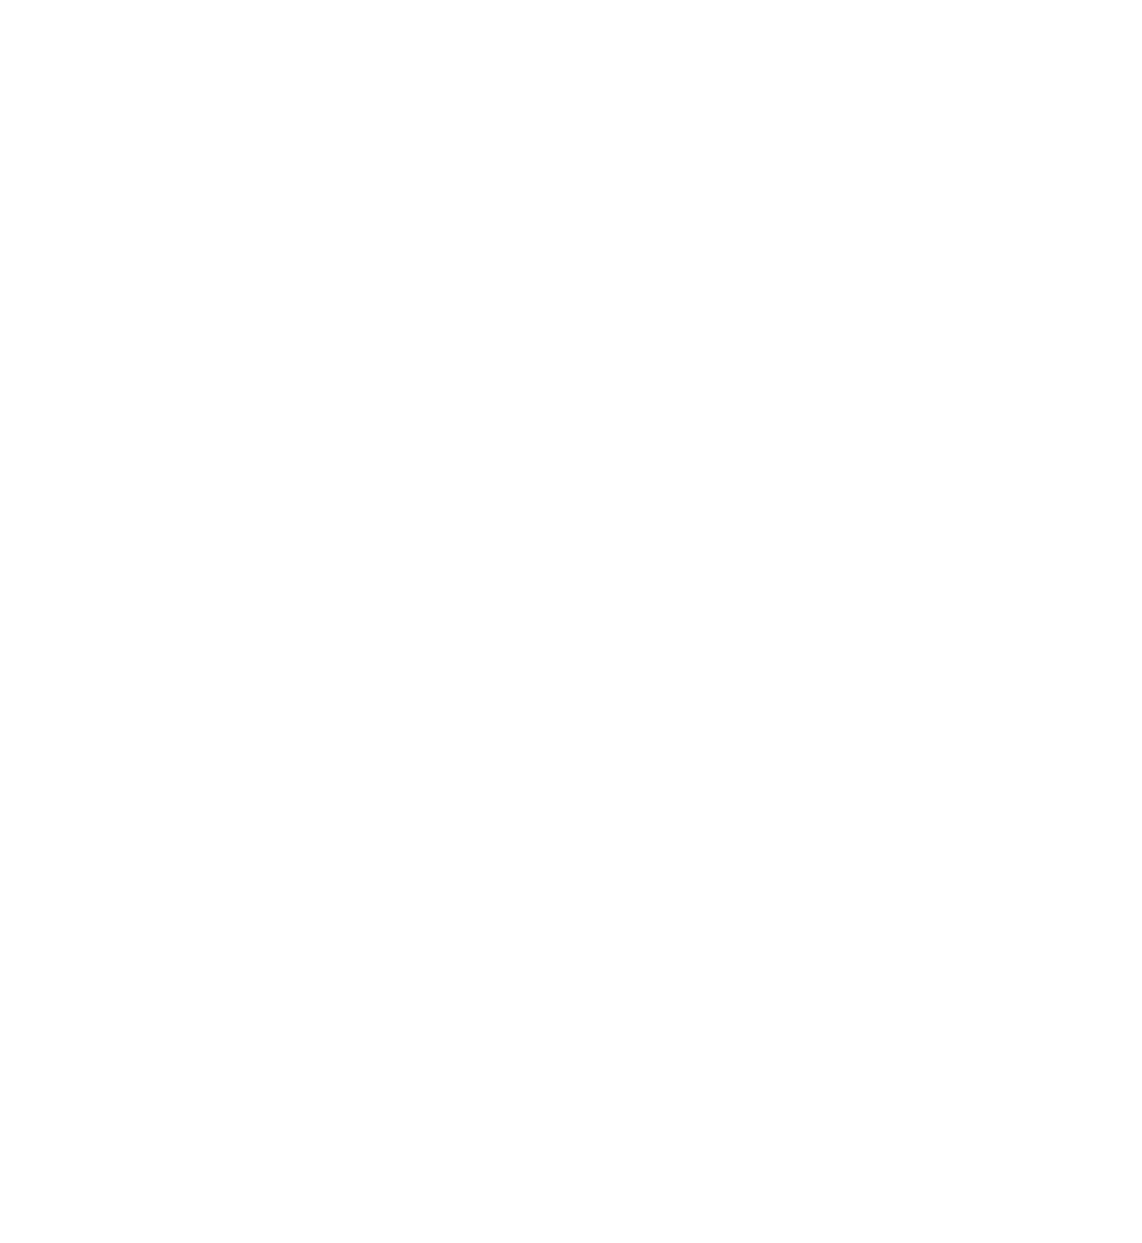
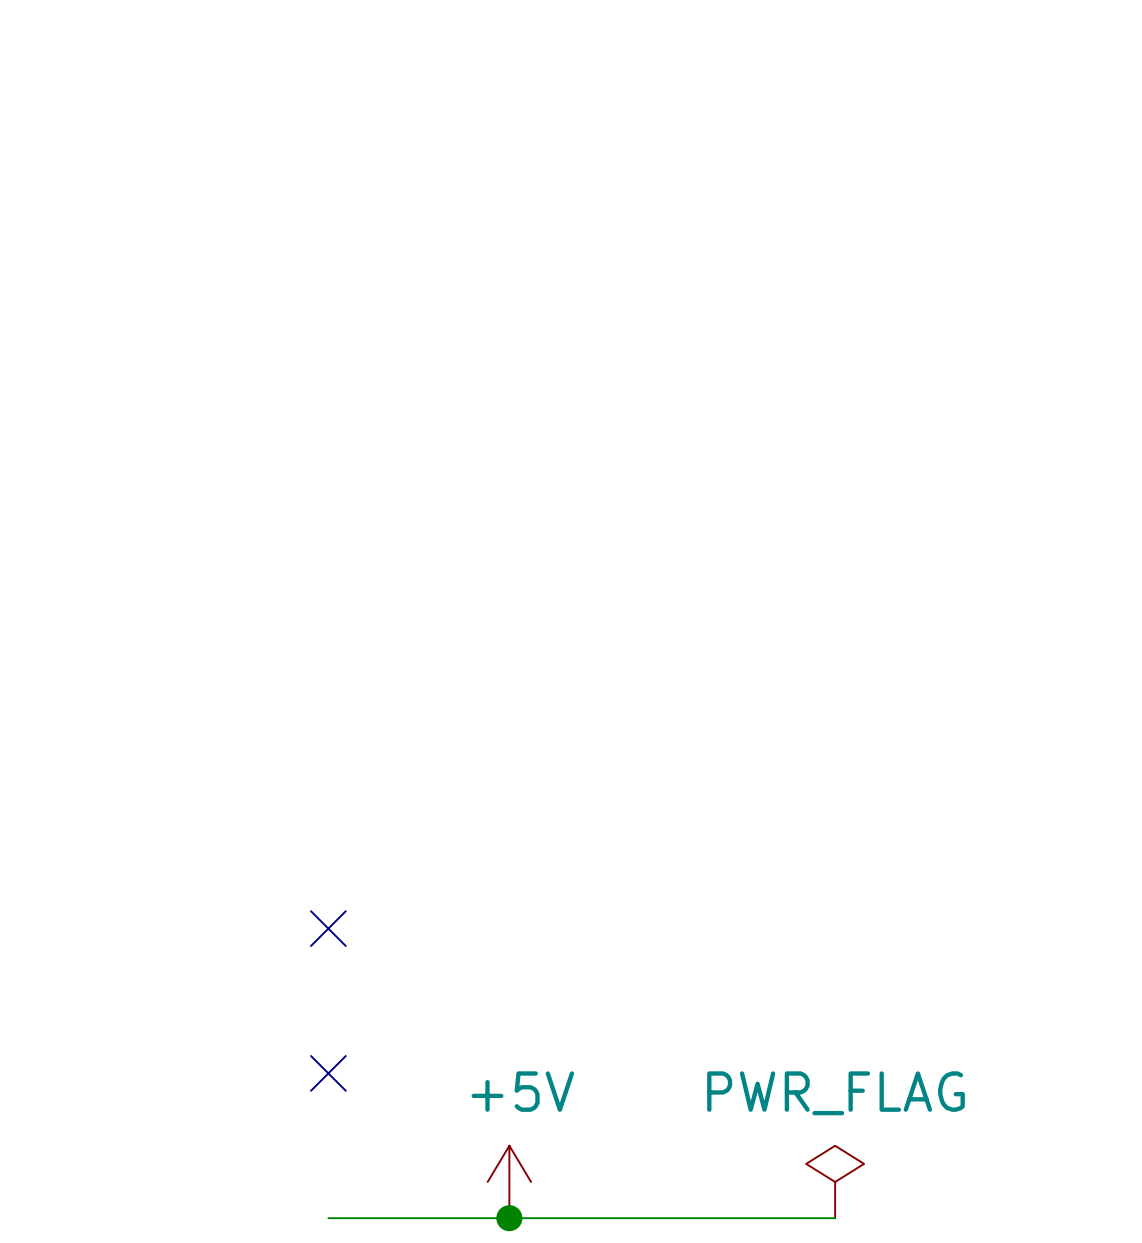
no-connect mark: none -> (328, 928)
no-connect mark: none -> (328, 1073)
power symbol: none -> +5V (509, 1181)
power symbol: none -> PWR_FLAG (835, 1181)
wire: none -> (328, 1218) (835, 1218)
junction: none -> (509, 1218)

